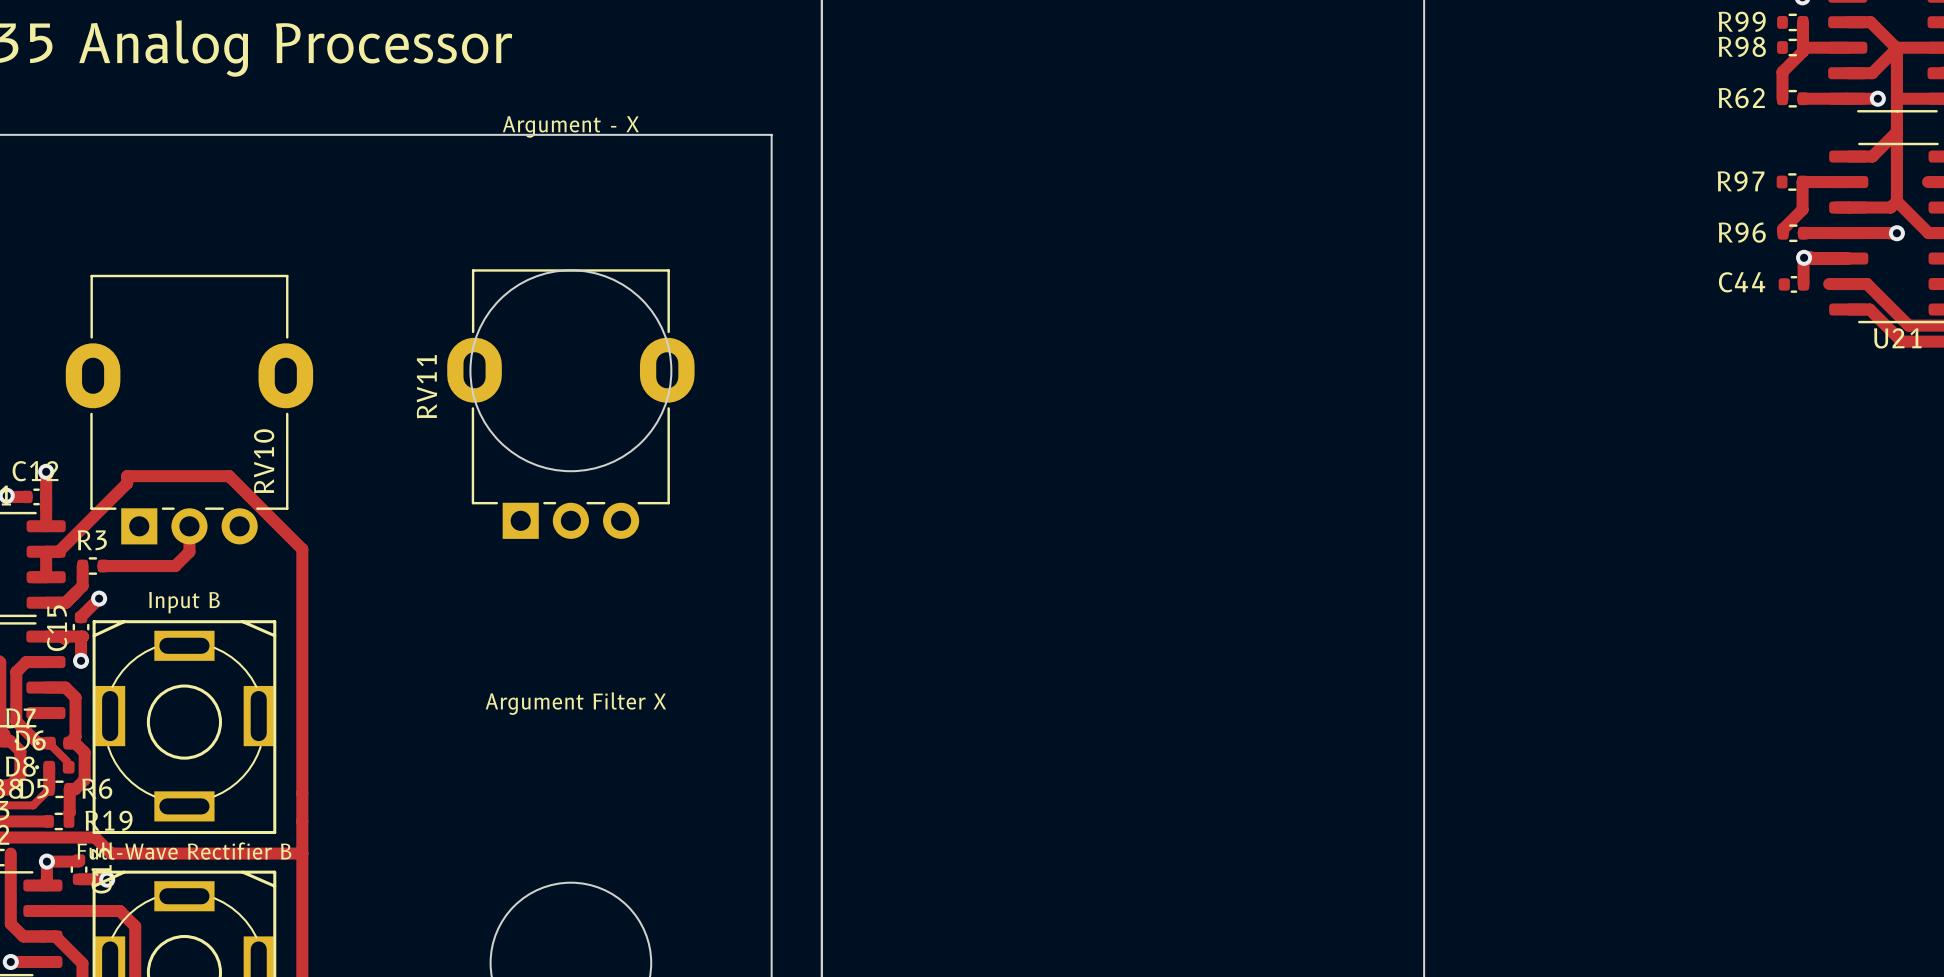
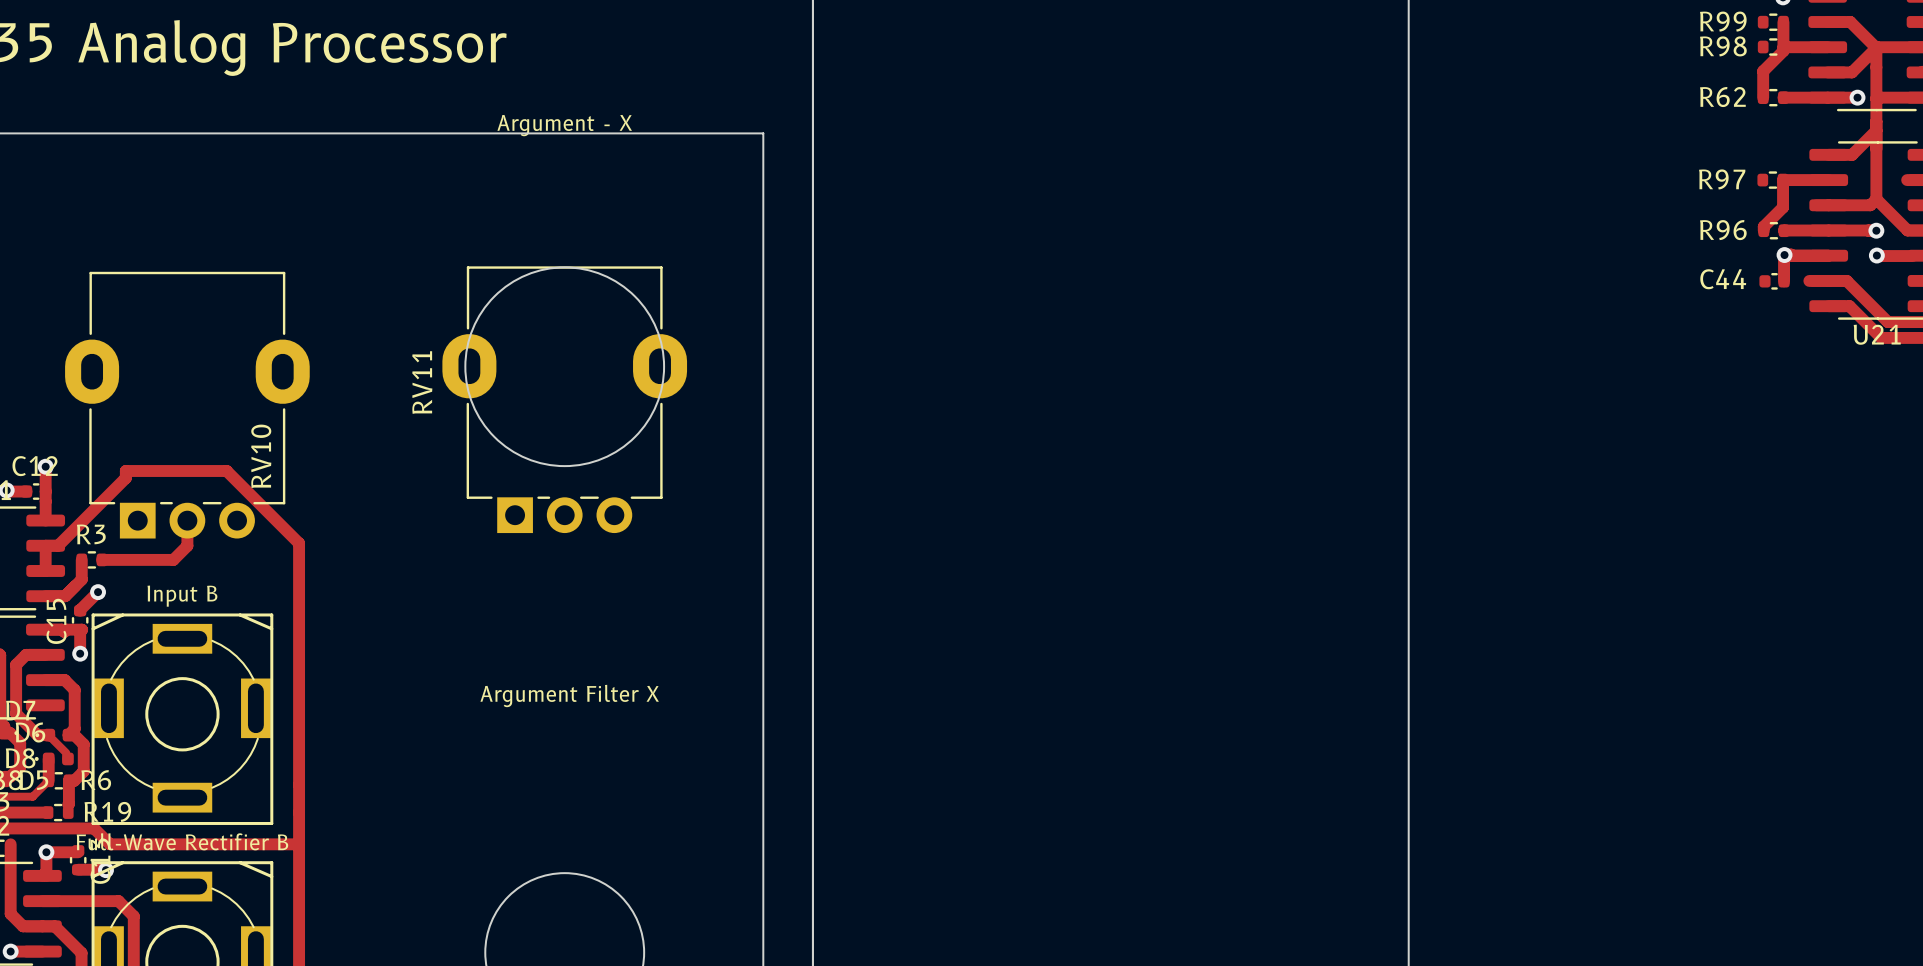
track: none -> (1876, 256) (1912, 256)
via: none -> (1876, 255)

